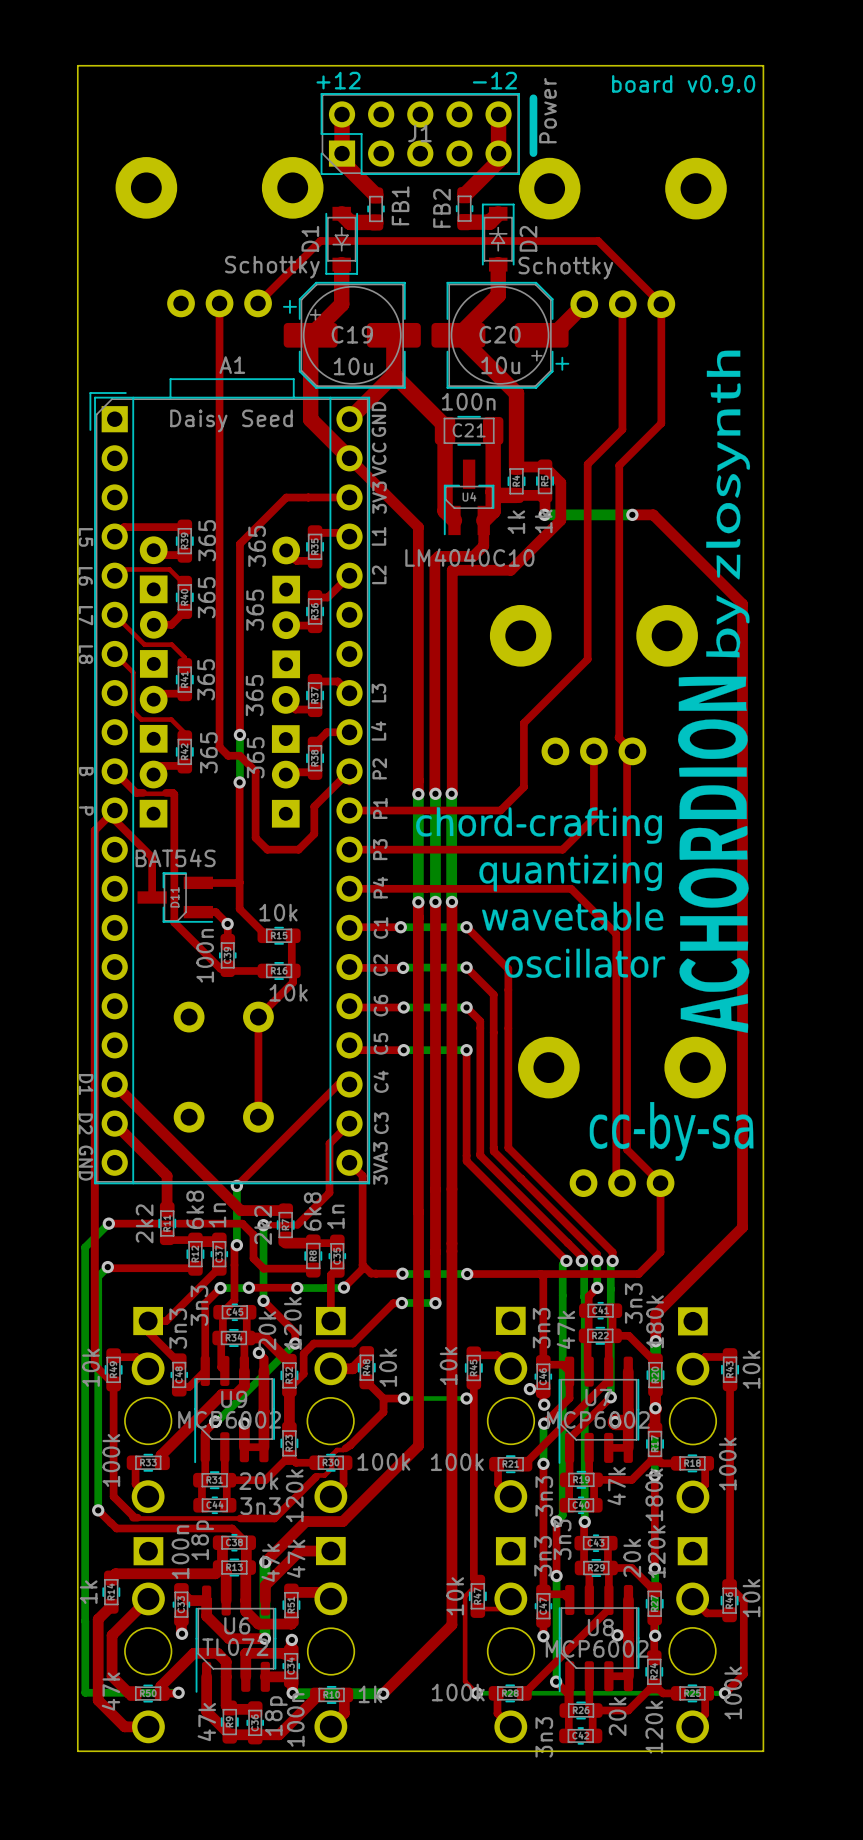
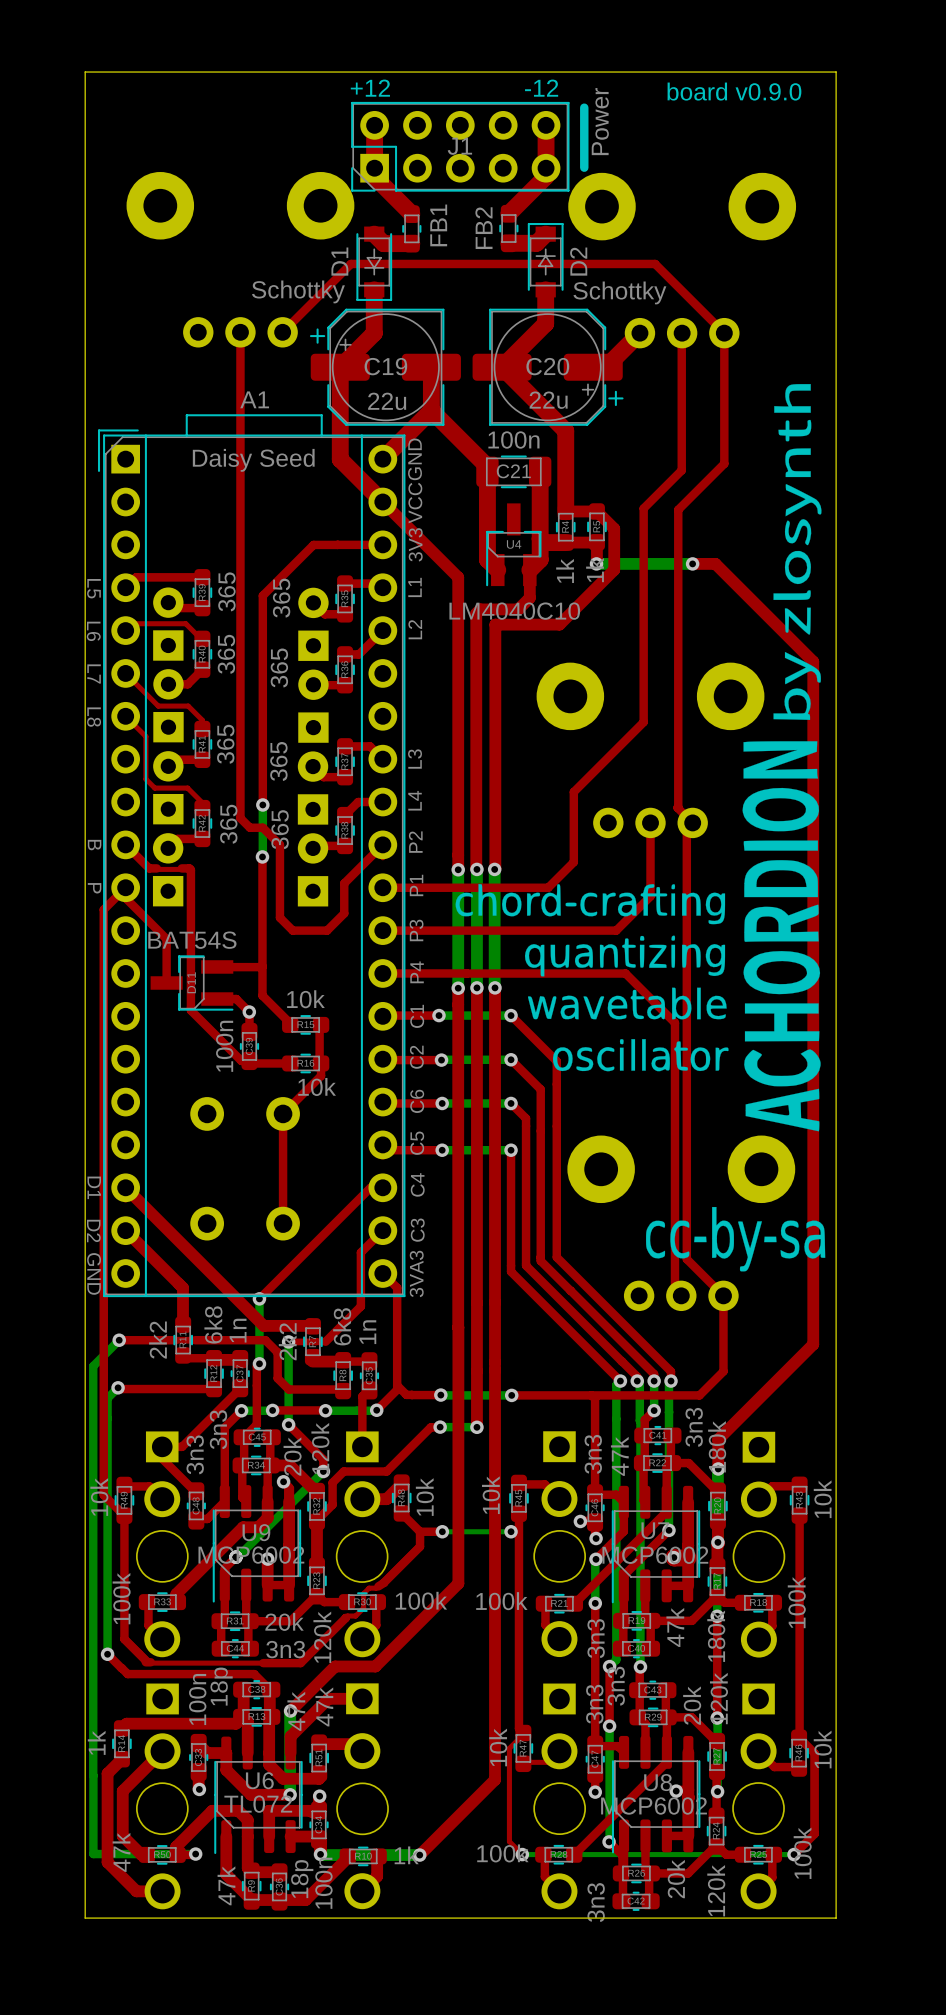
C20 value: 10u (500, 365) -> 22u (548, 400)
C19 value: 10u (353, 366) -> 22u (387, 401)

